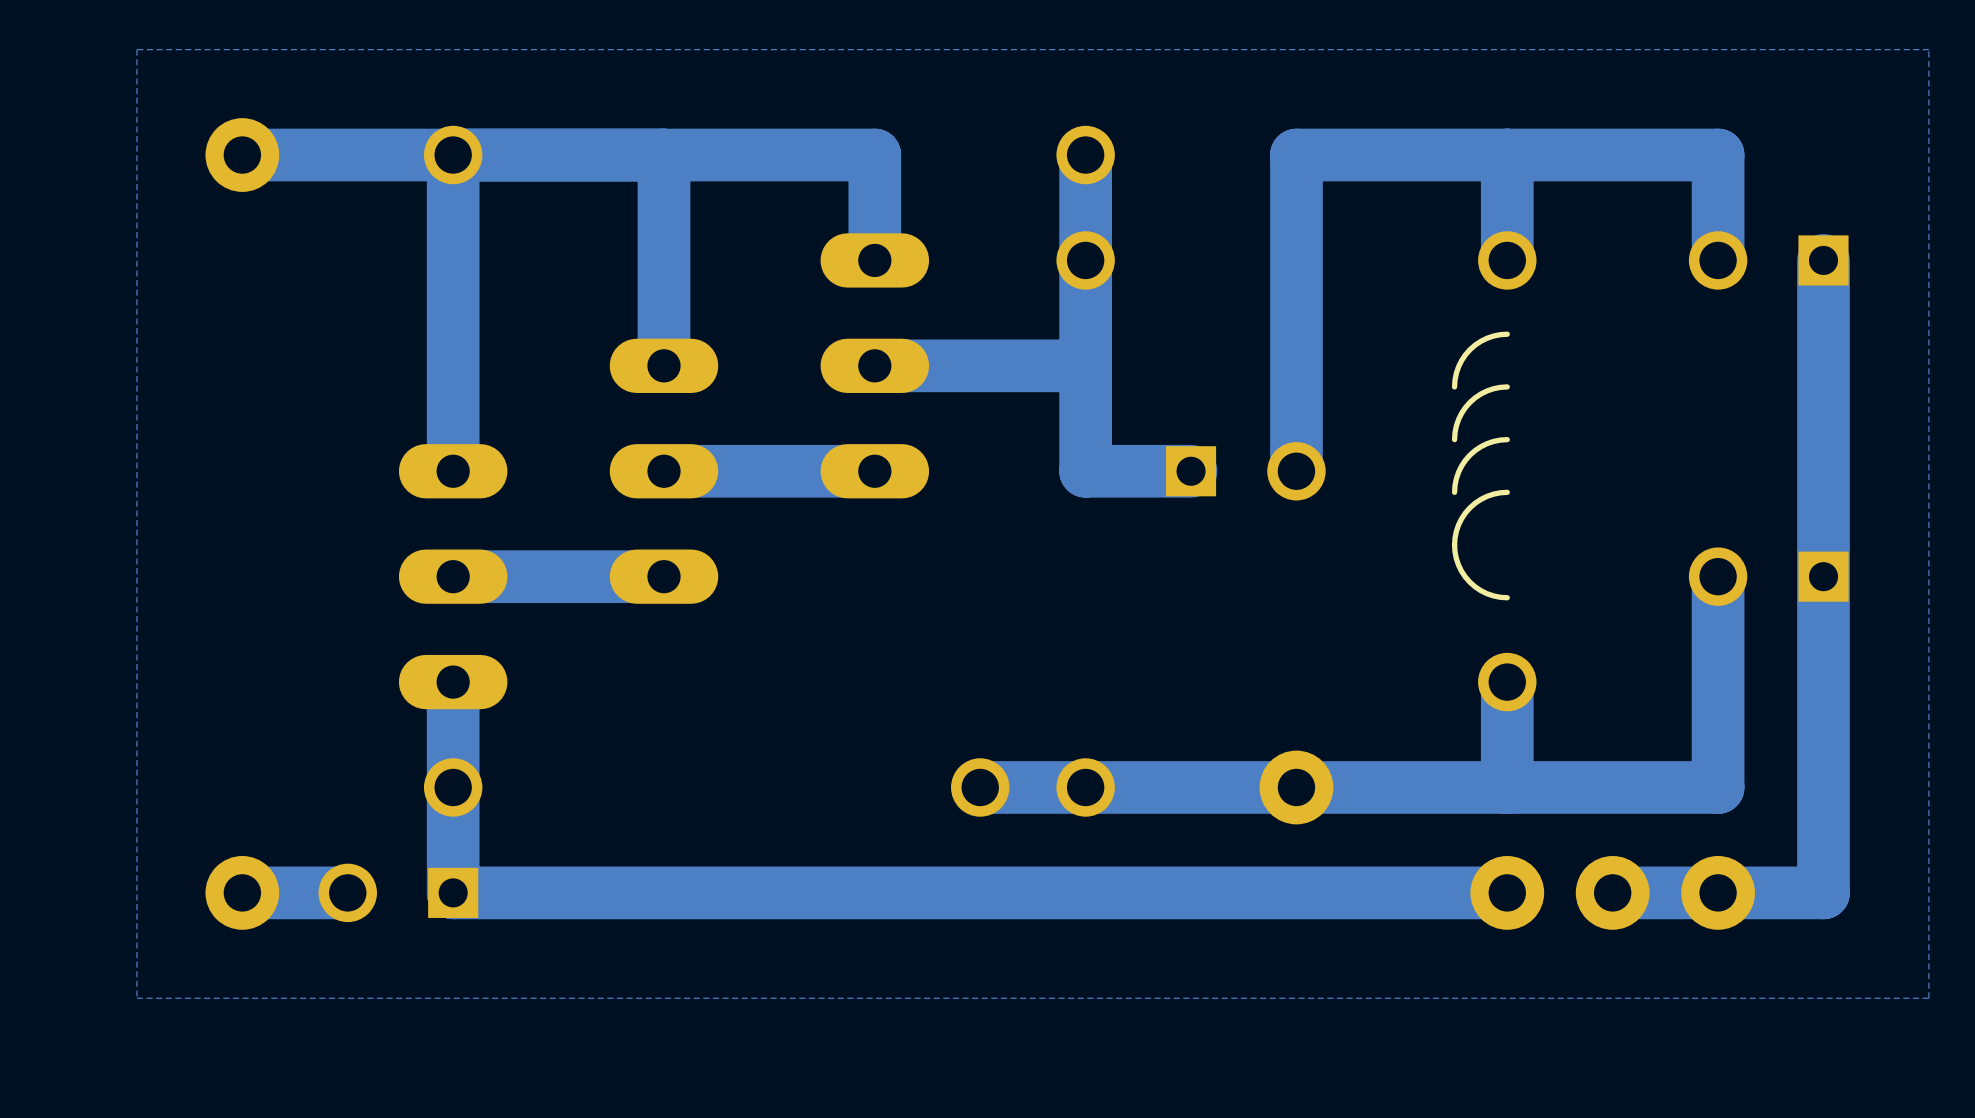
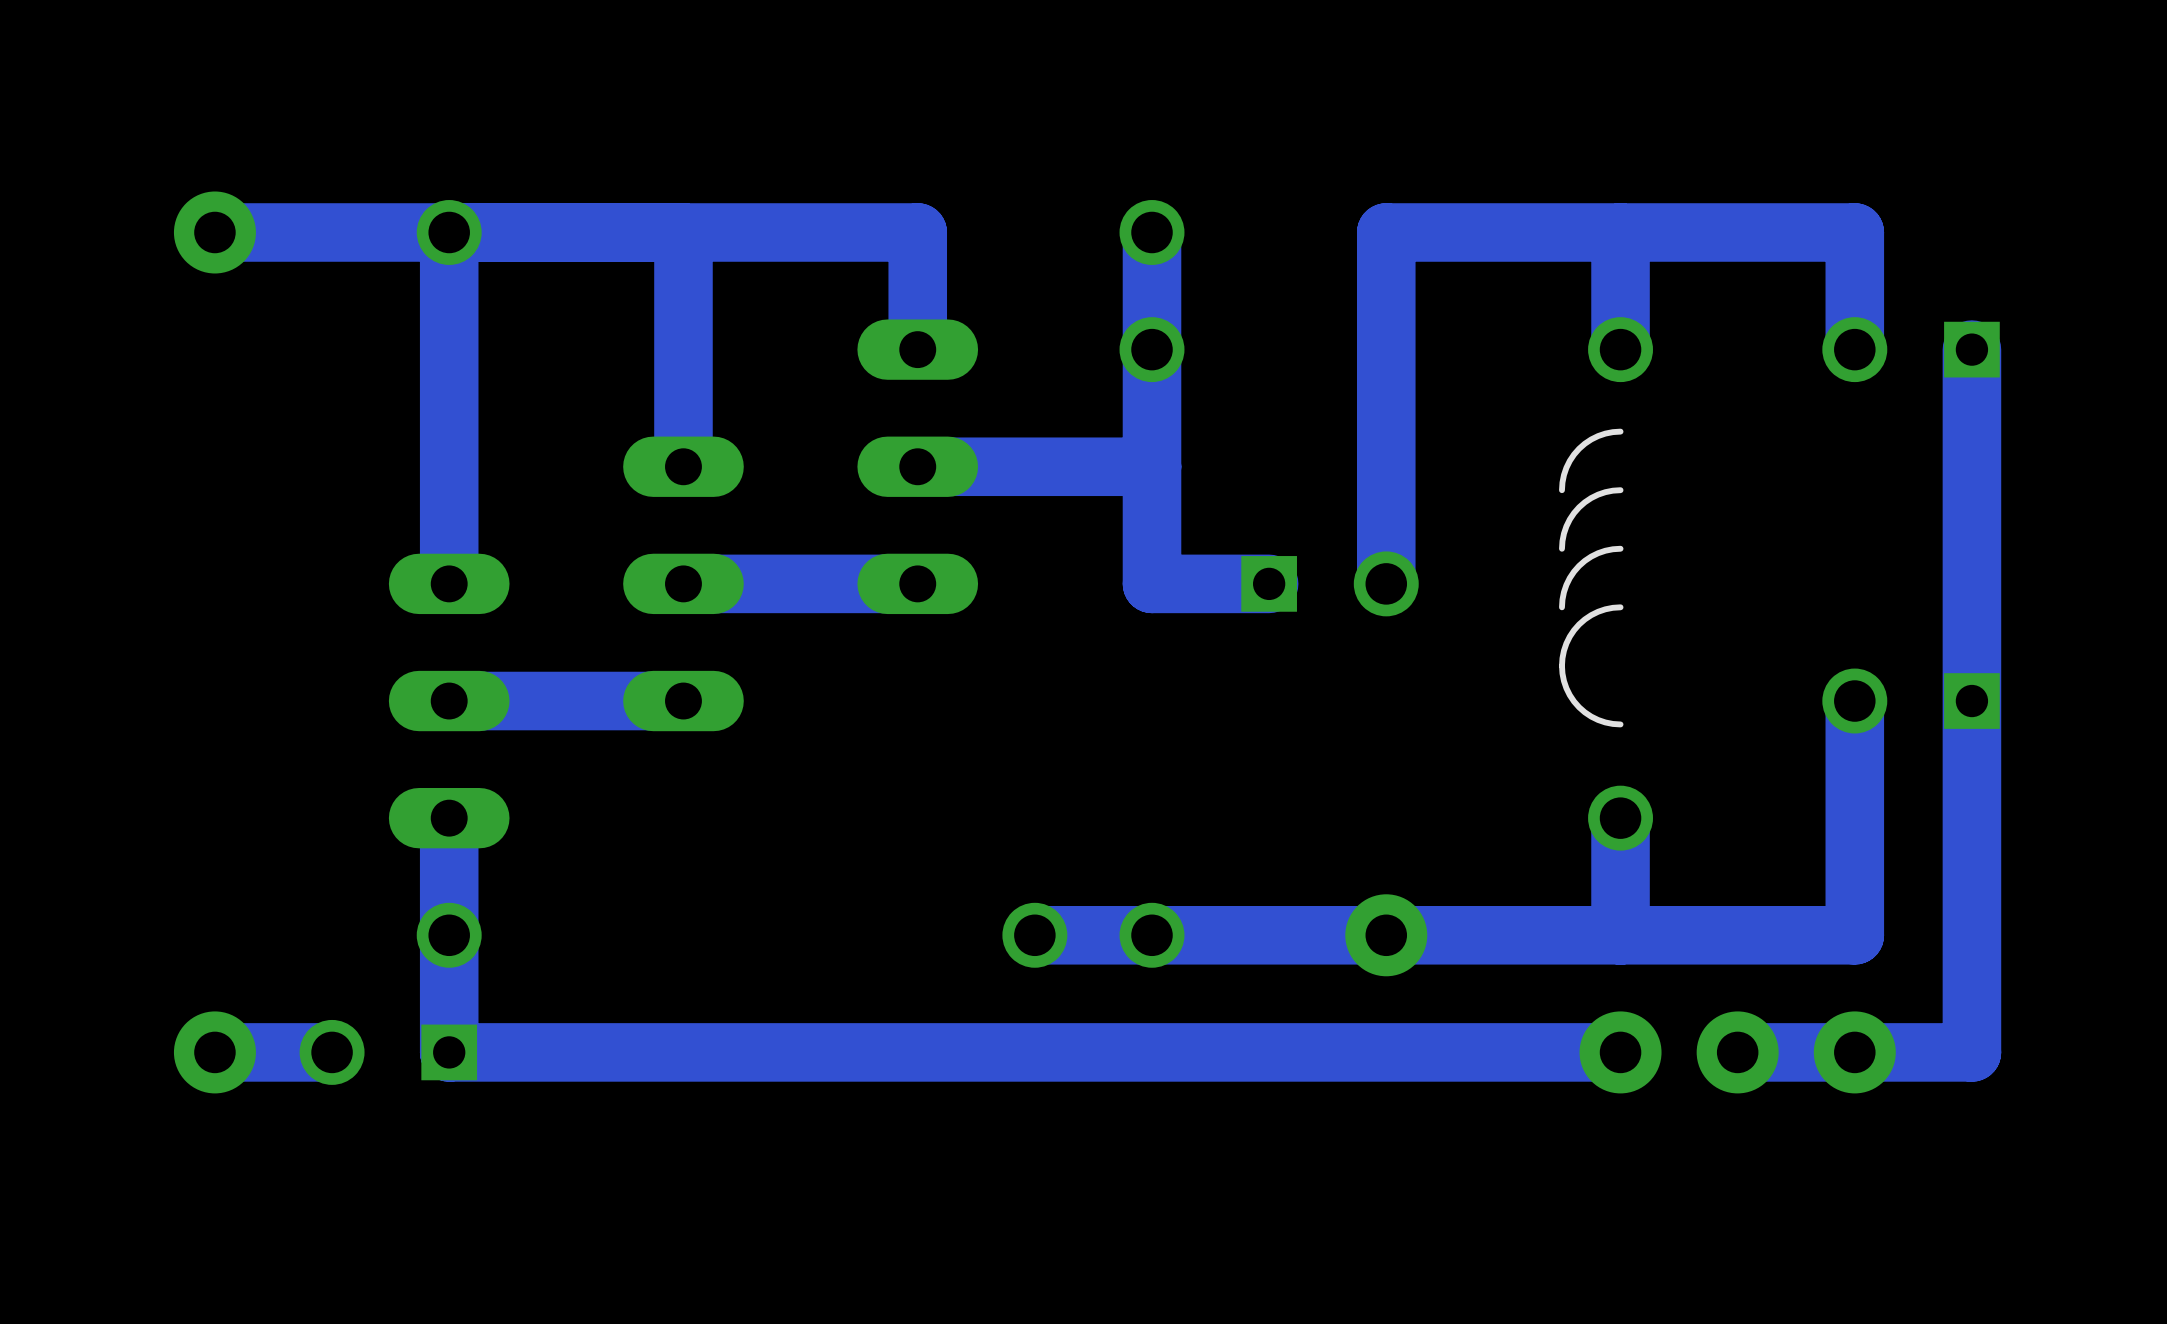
zone outline: (1928, 49) (136, 49) (136, 998) (1928, 998) (1928, 49) -> none

